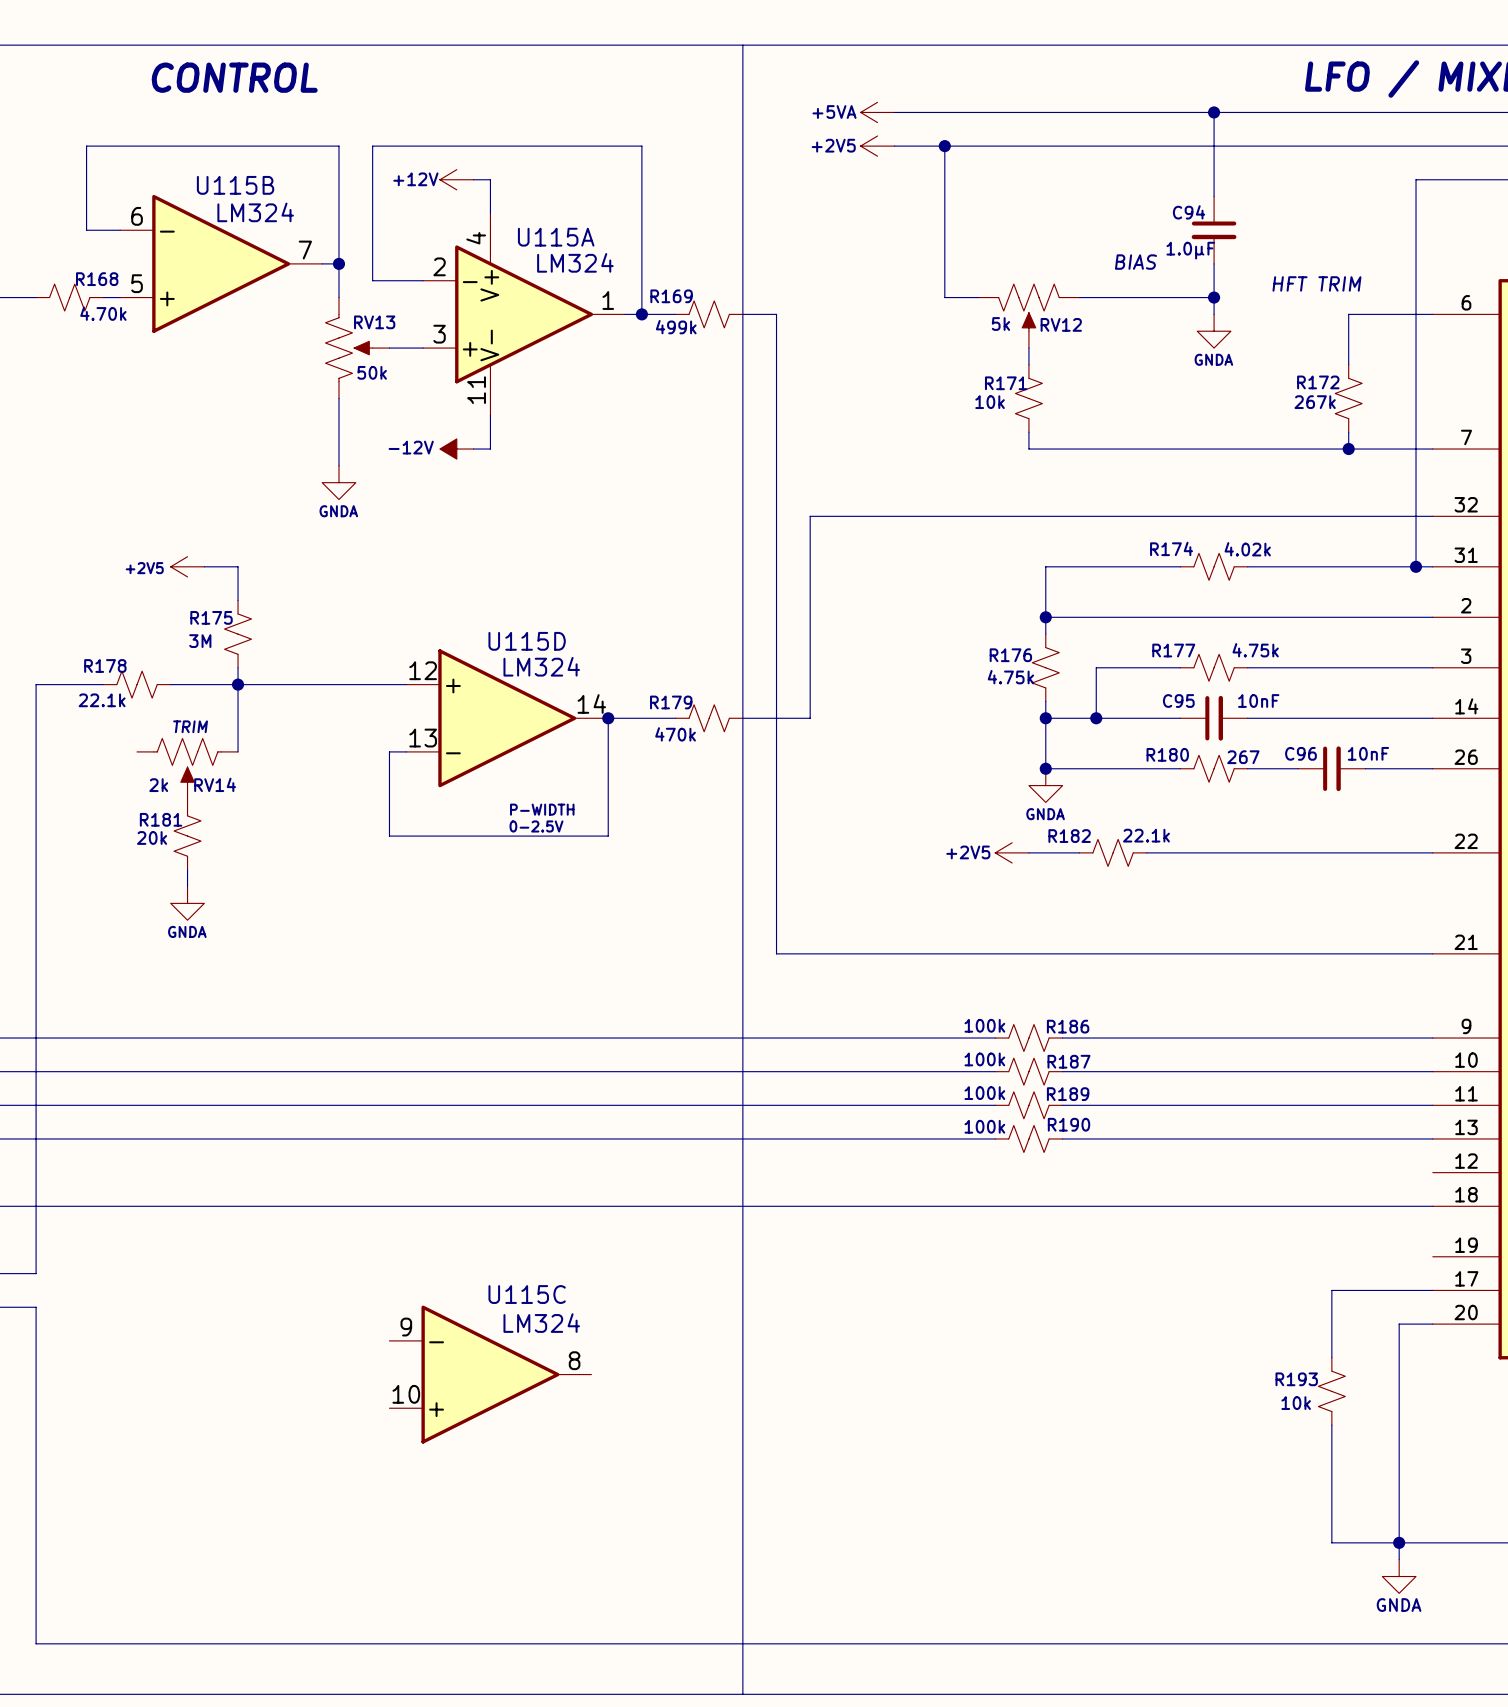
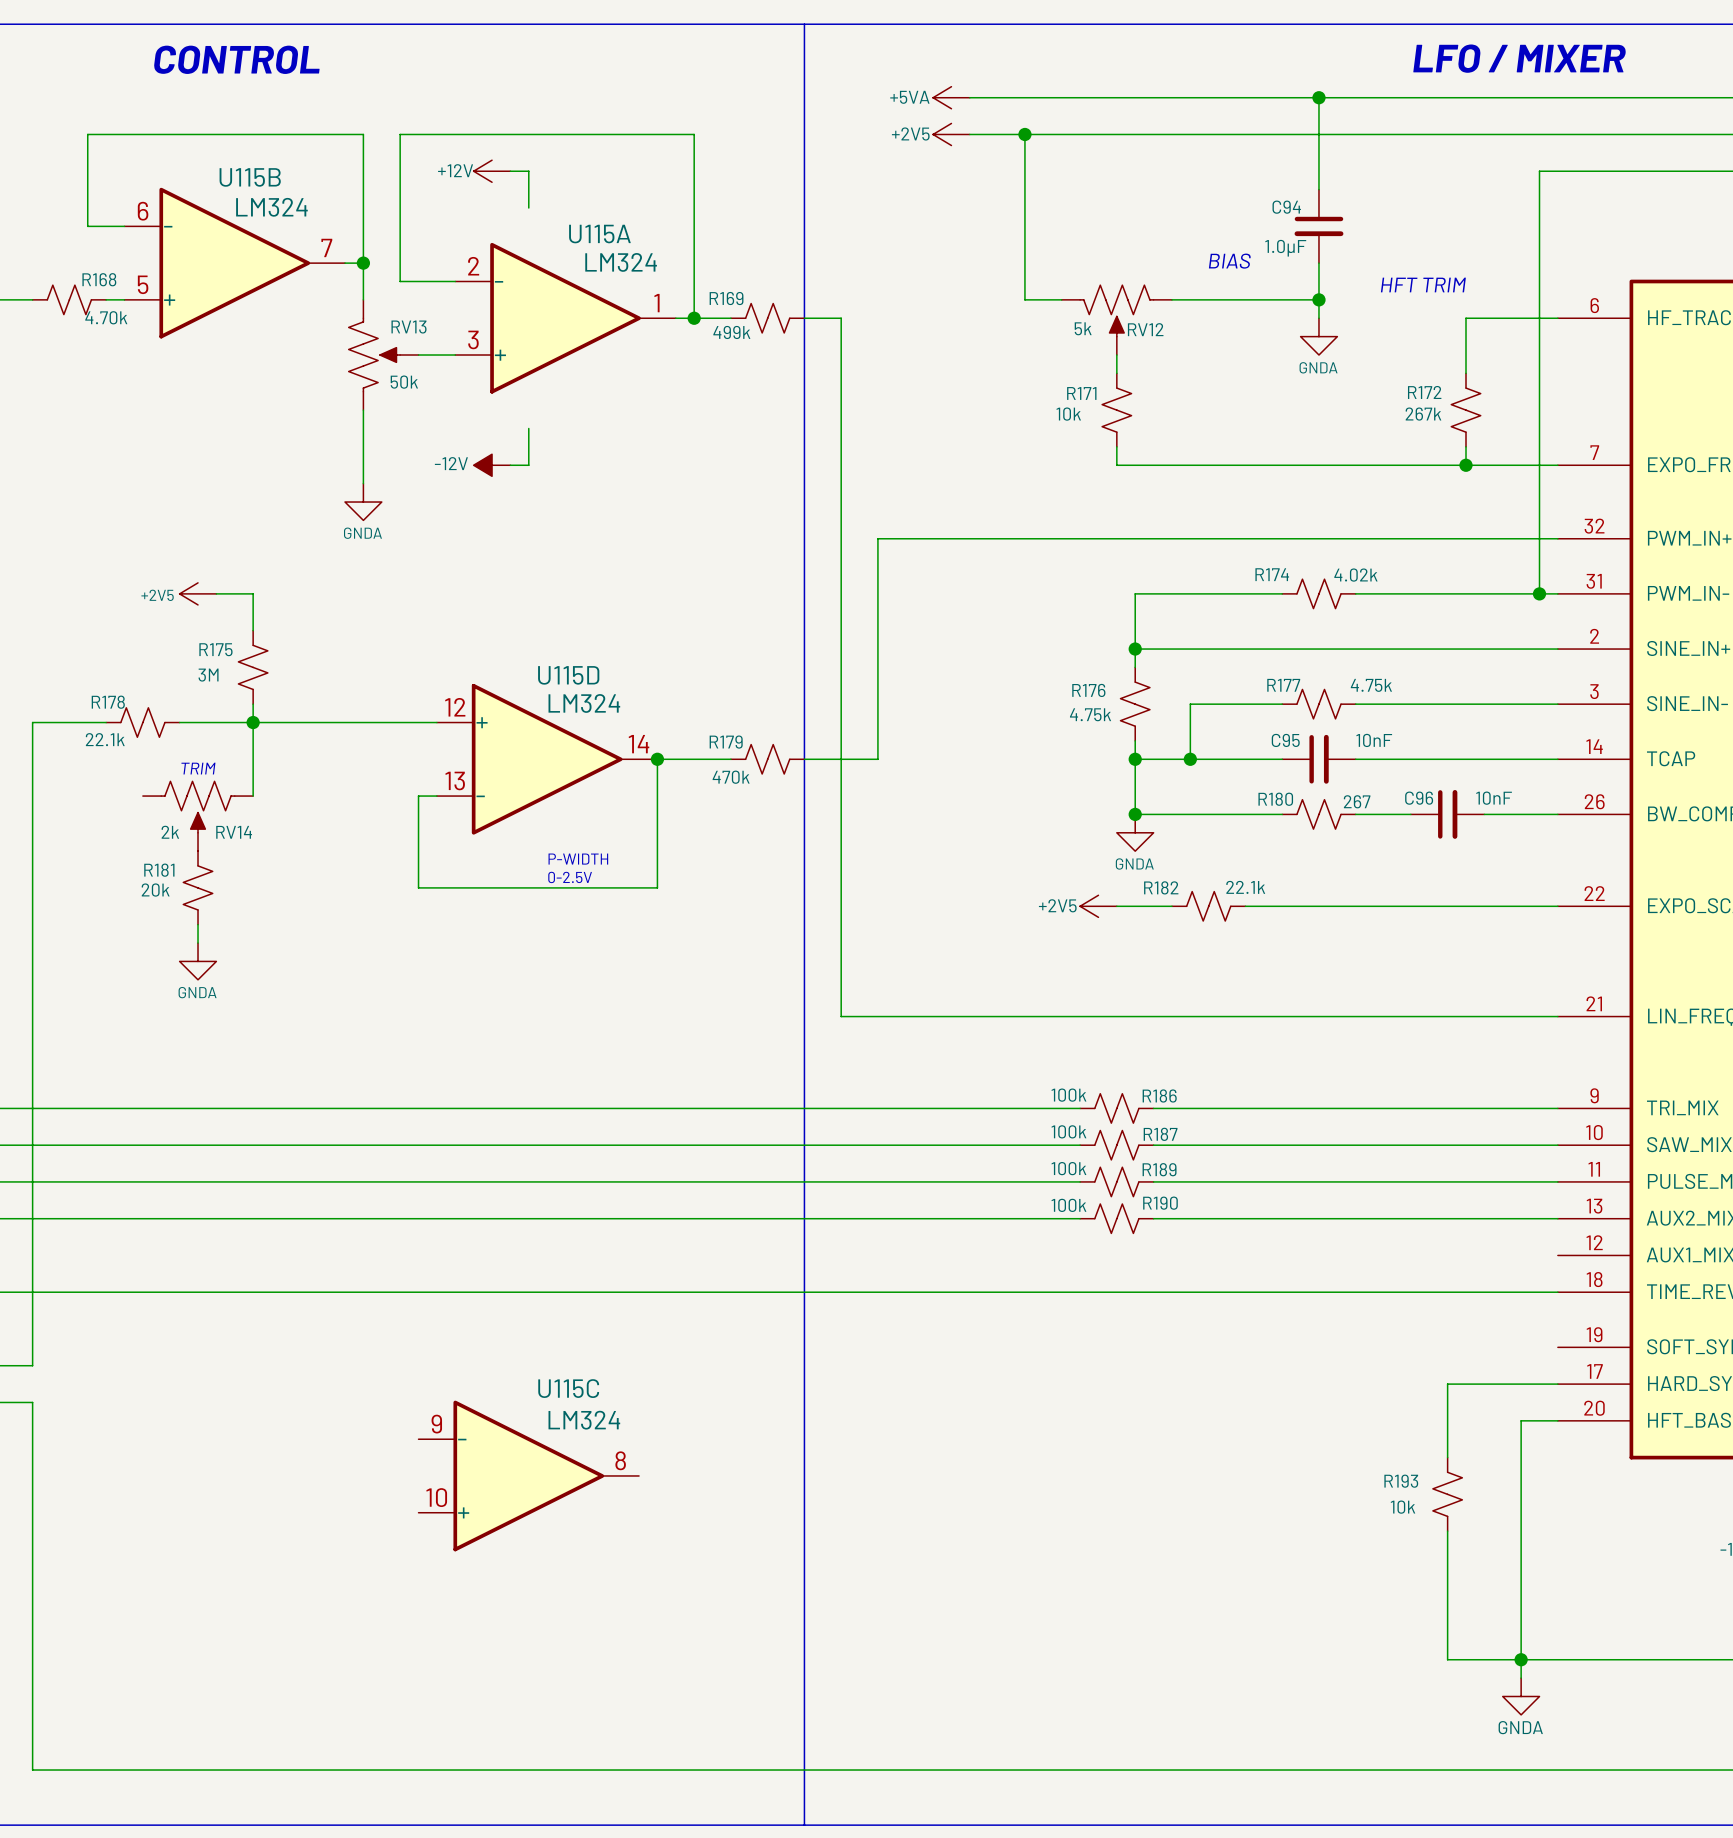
part: (490, 314) -> none

